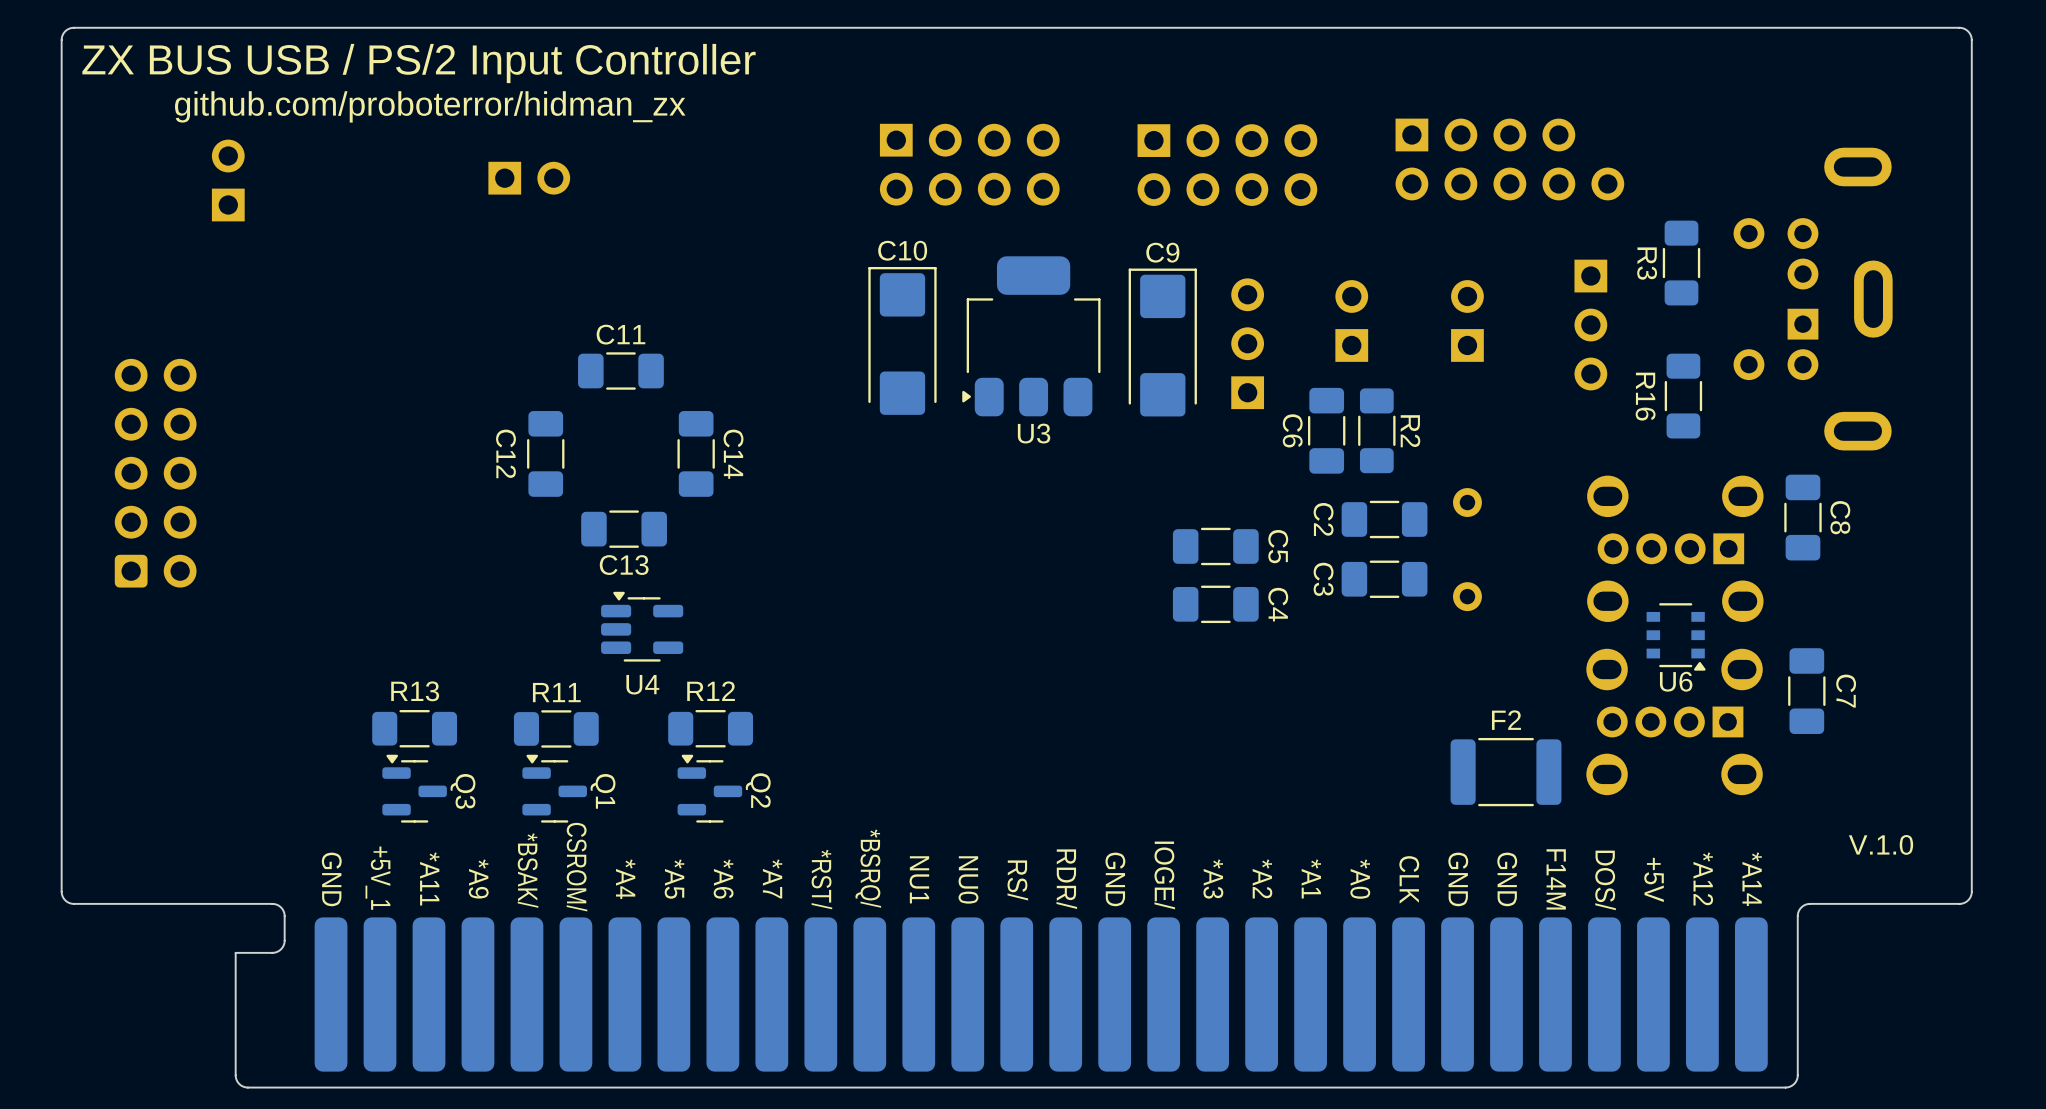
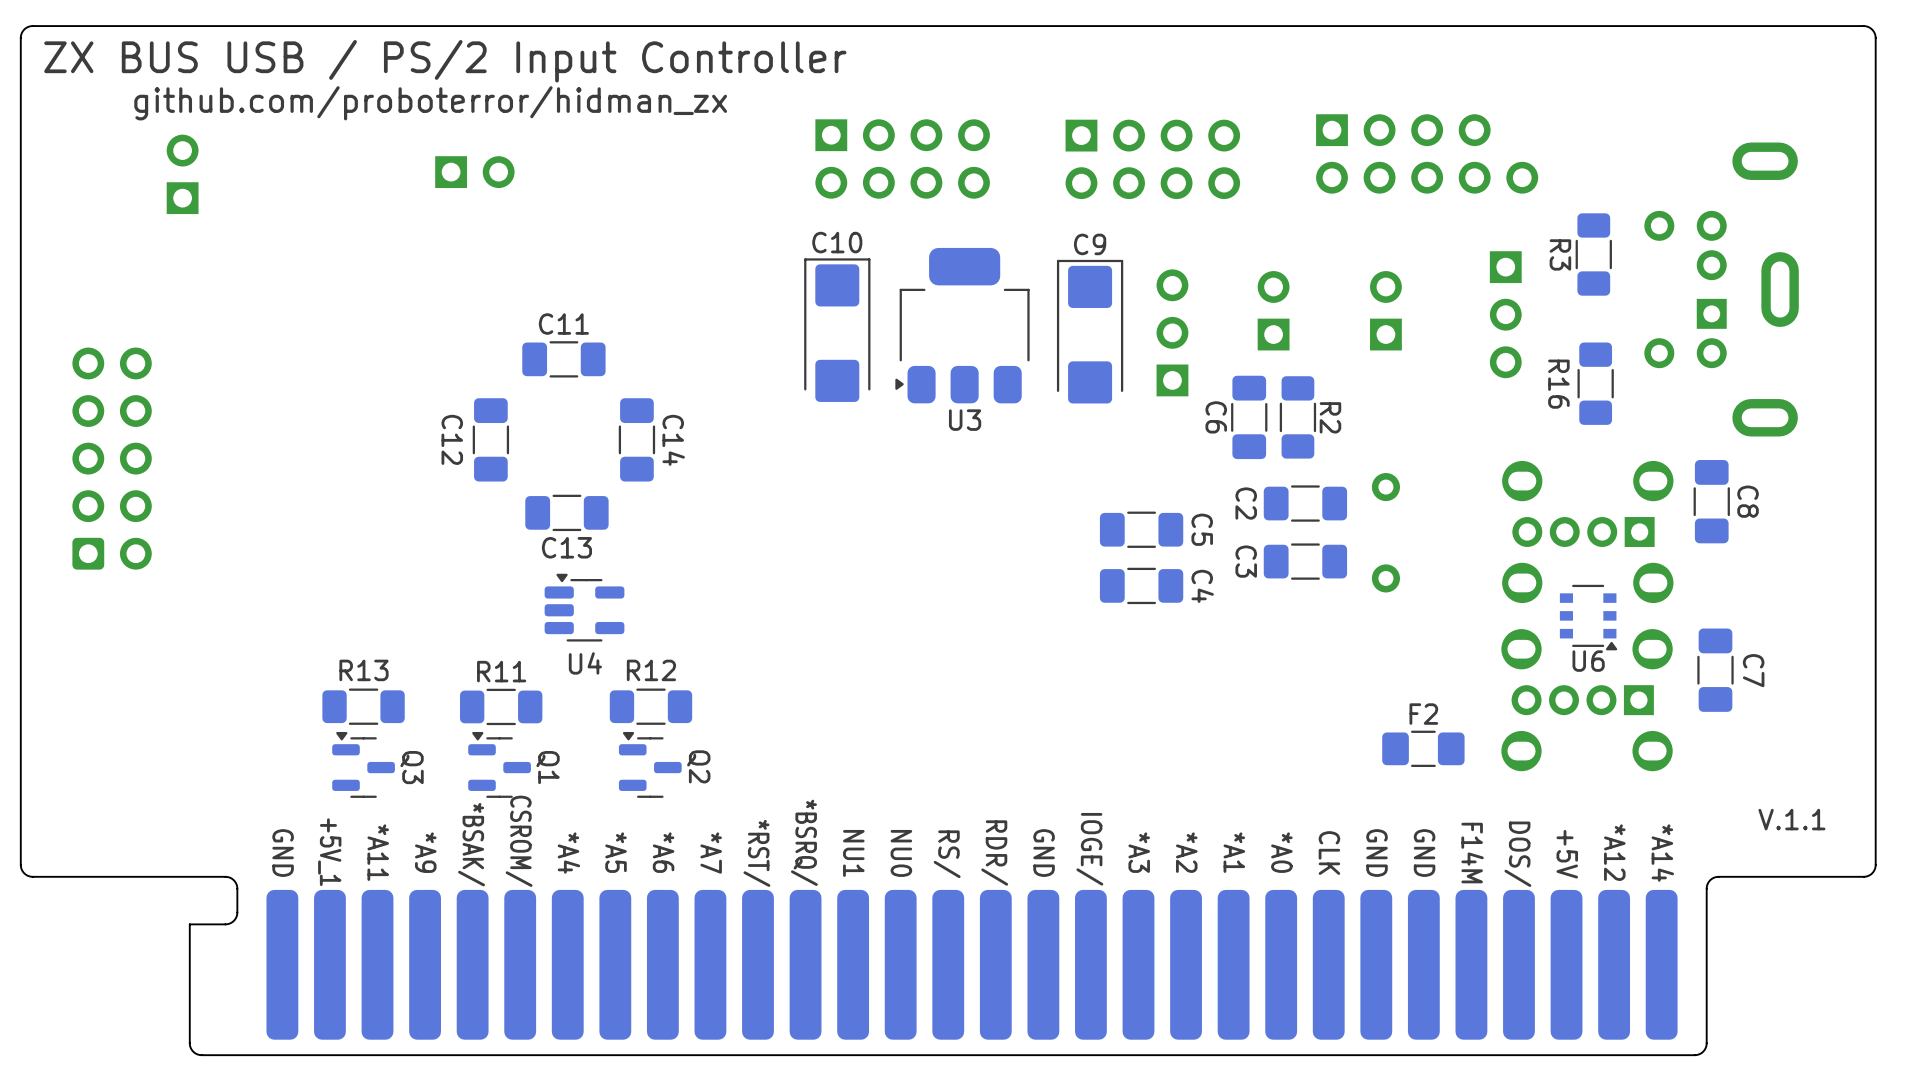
F2 footprint: [1450, 737, 1562, 807] -> [1382, 730, 1465, 767]
text: V.1.0 (1881, 844) -> V.1.1 (1791, 819)

